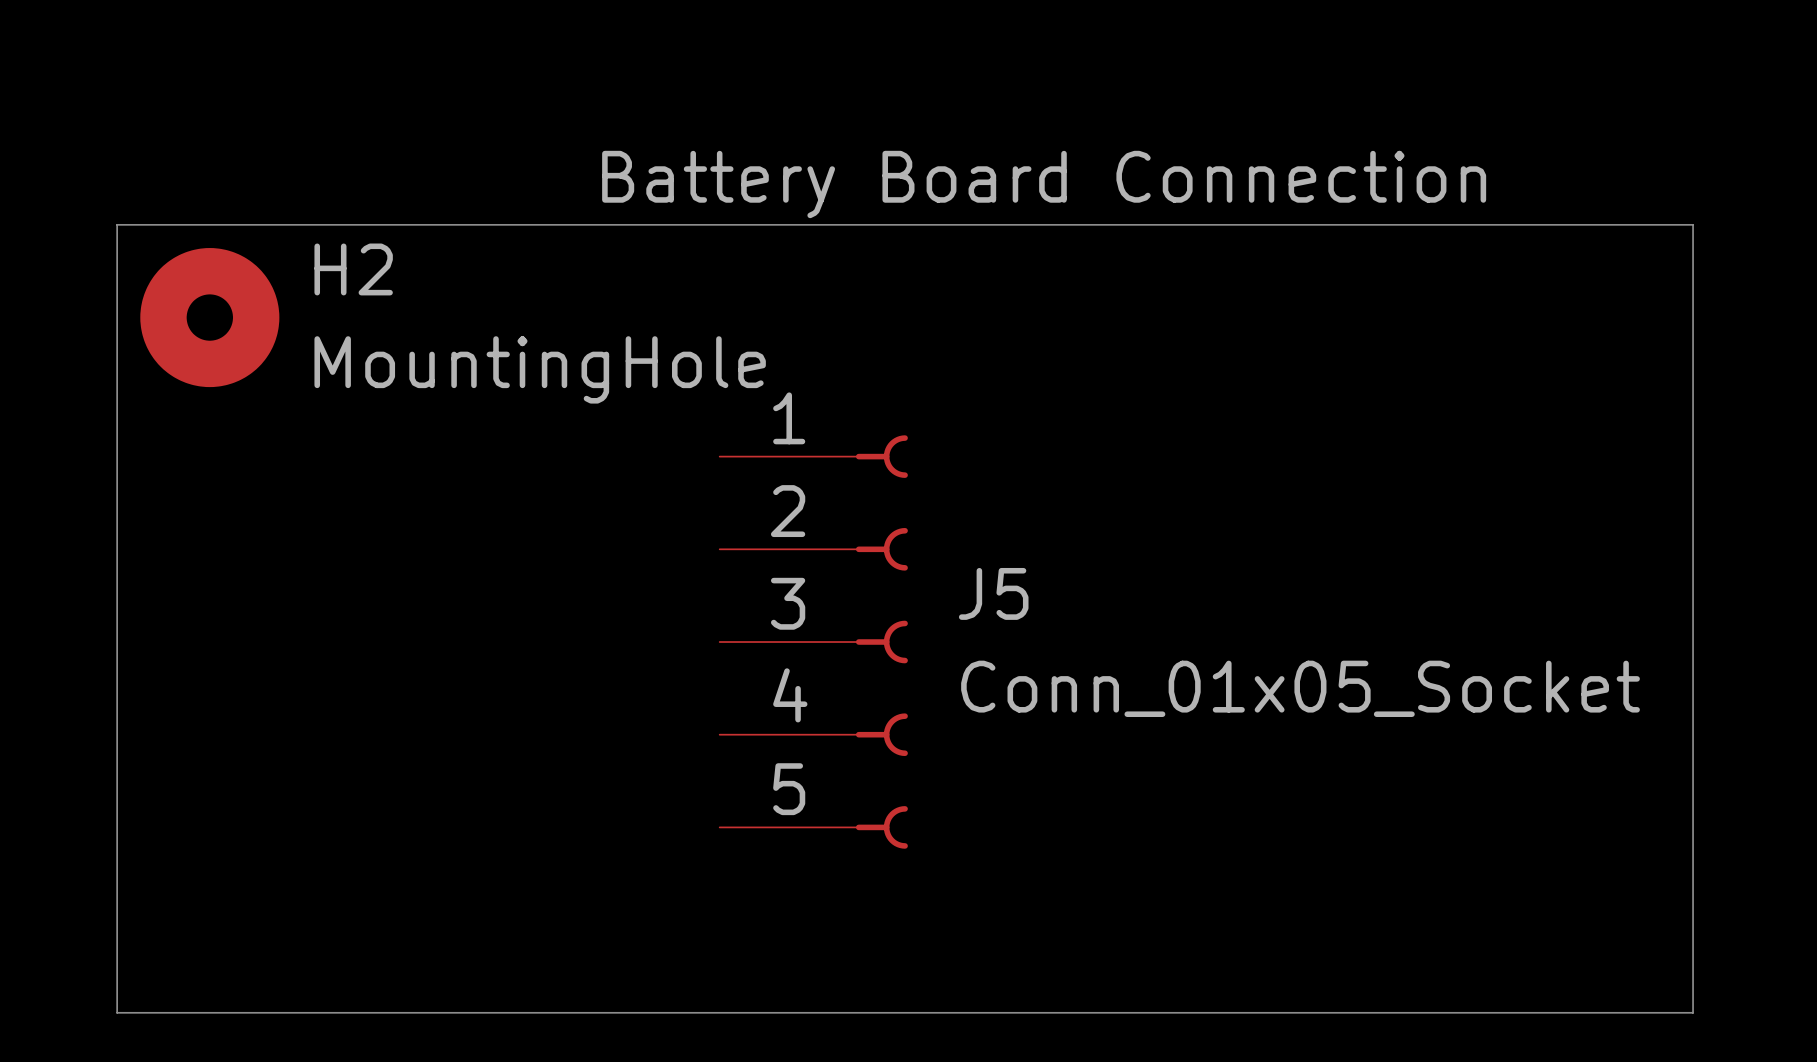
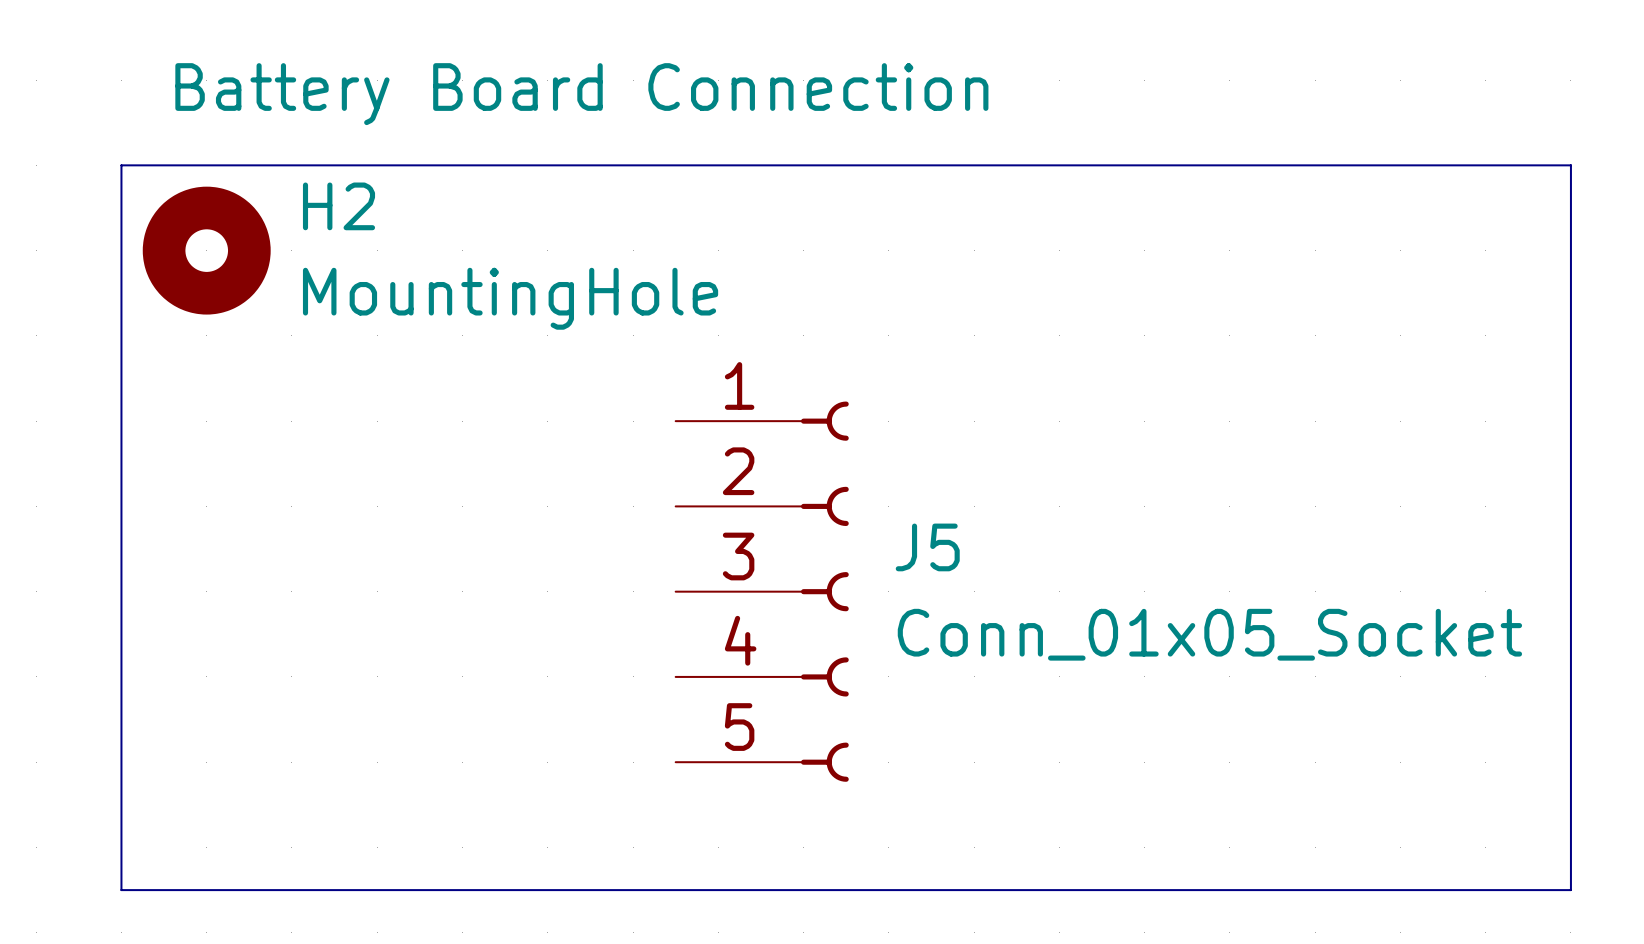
J5 text position: Battery Board Connection (1044, 184) -> Battery Board Connection (581, 94)
J5 position: (813, 642) -> (762, 591)

